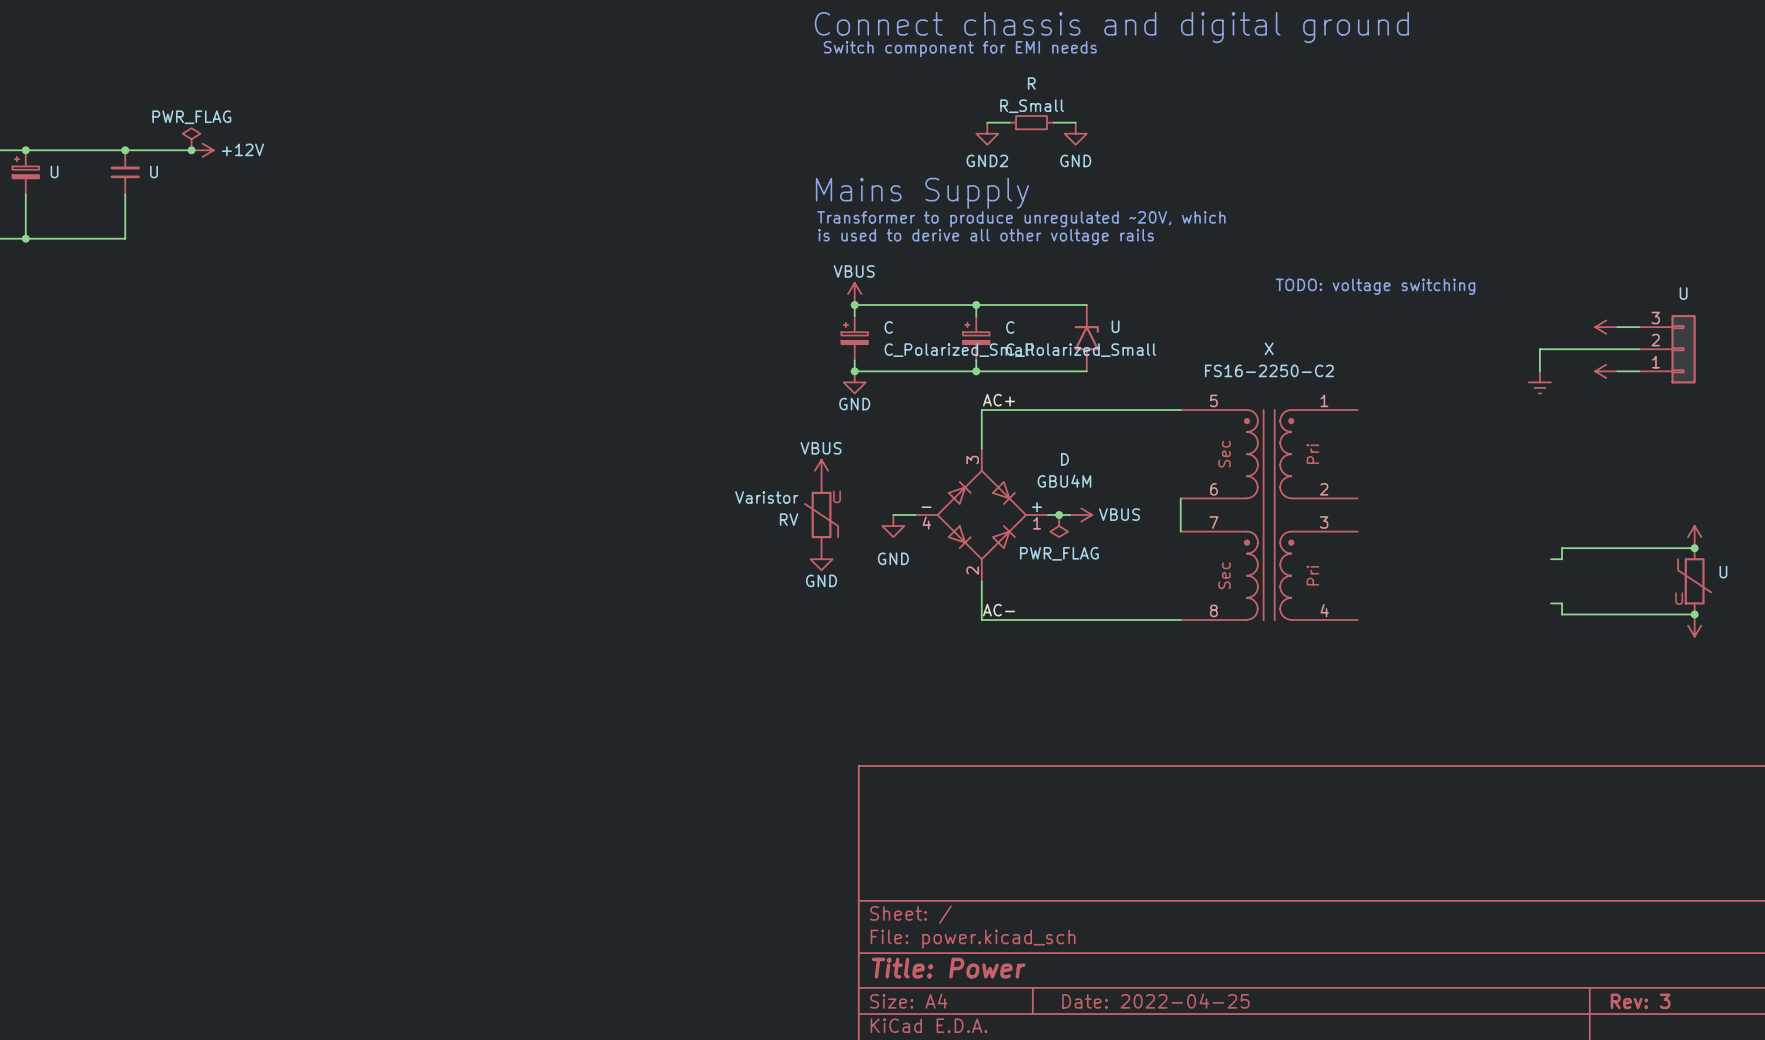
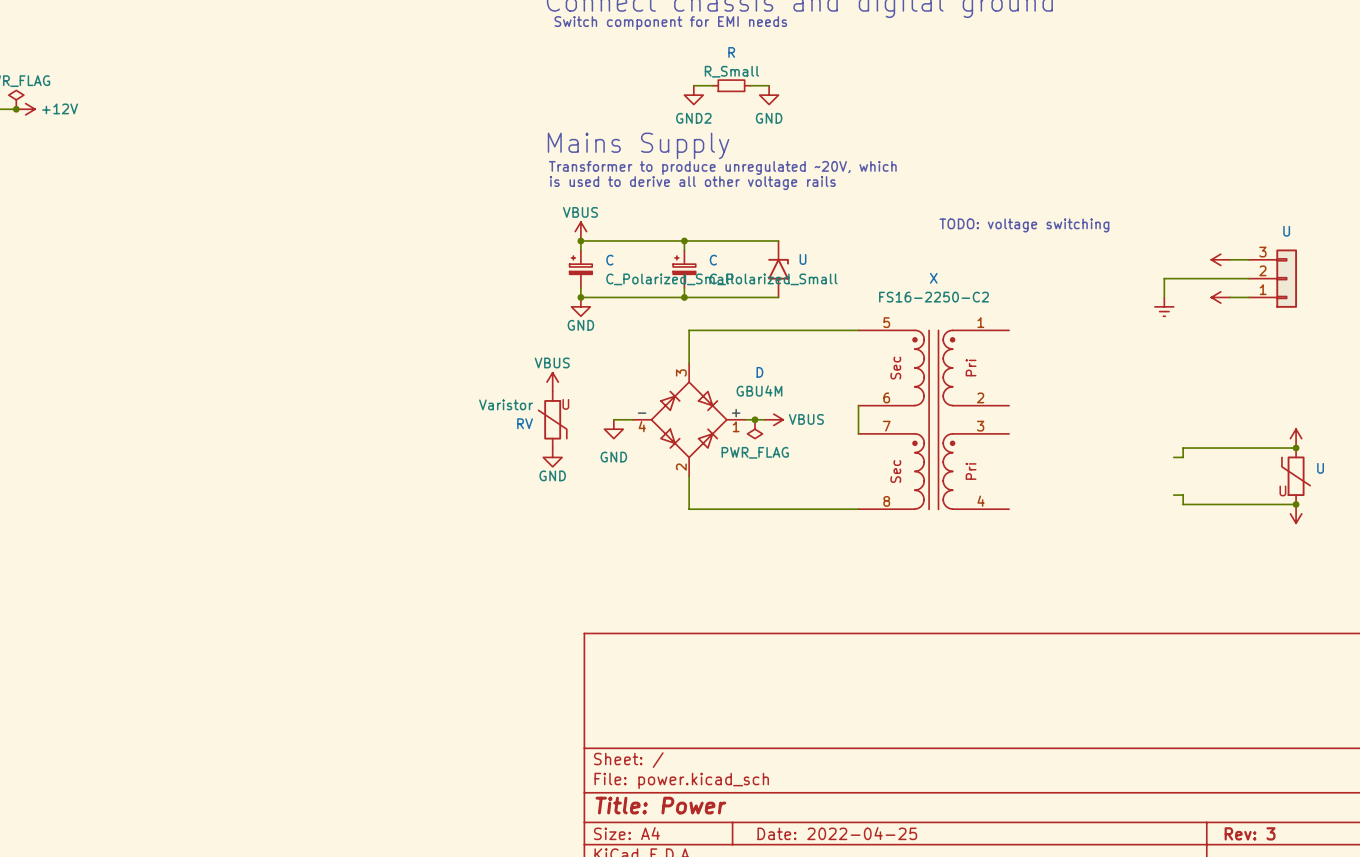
label: AC+ (998, 400) -> none
label: AC- (998, 610) -> none

